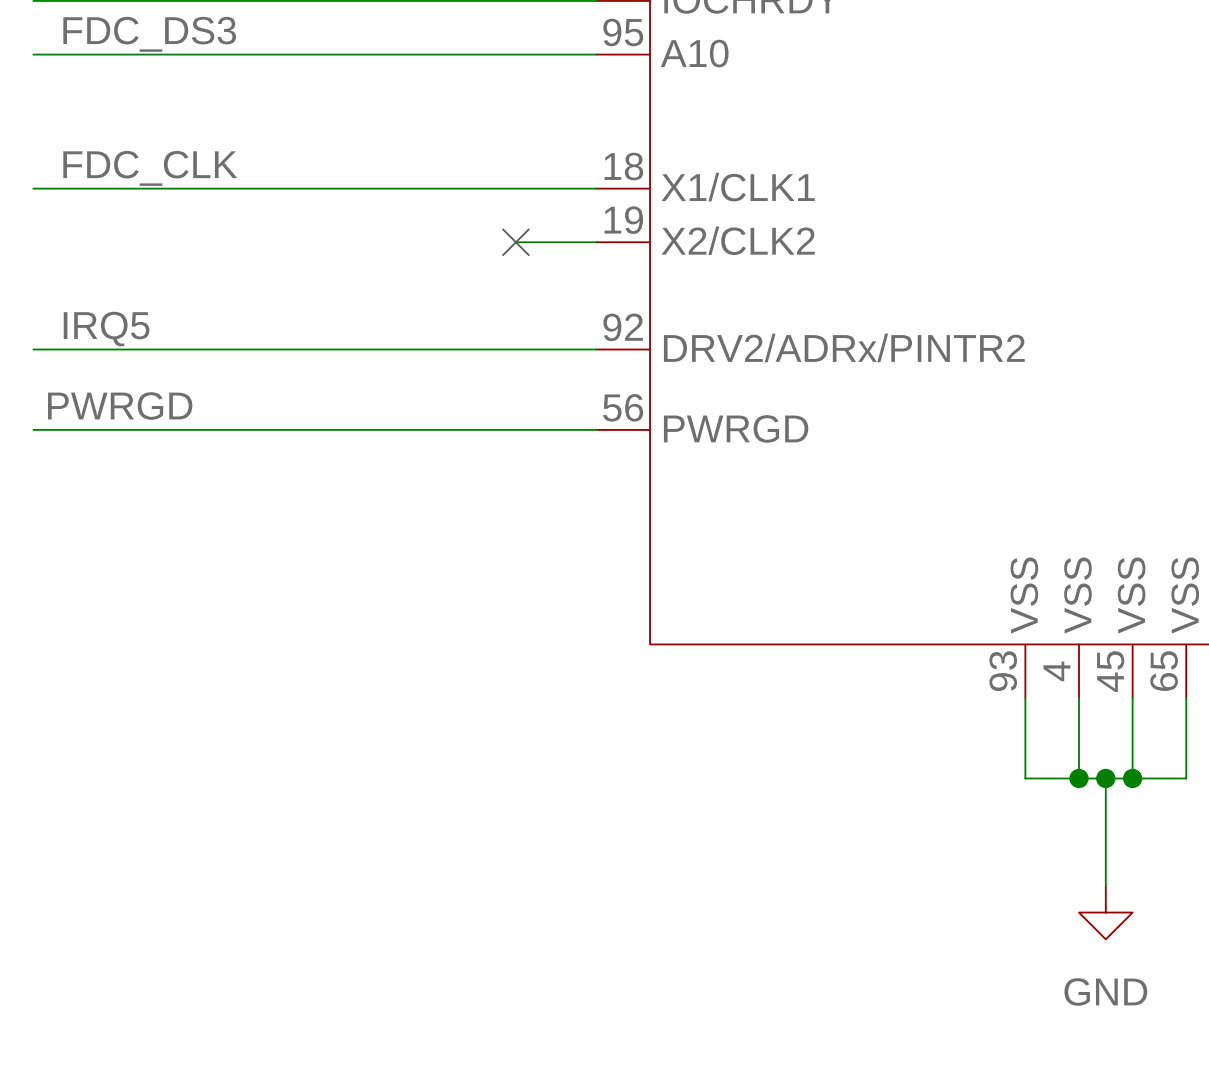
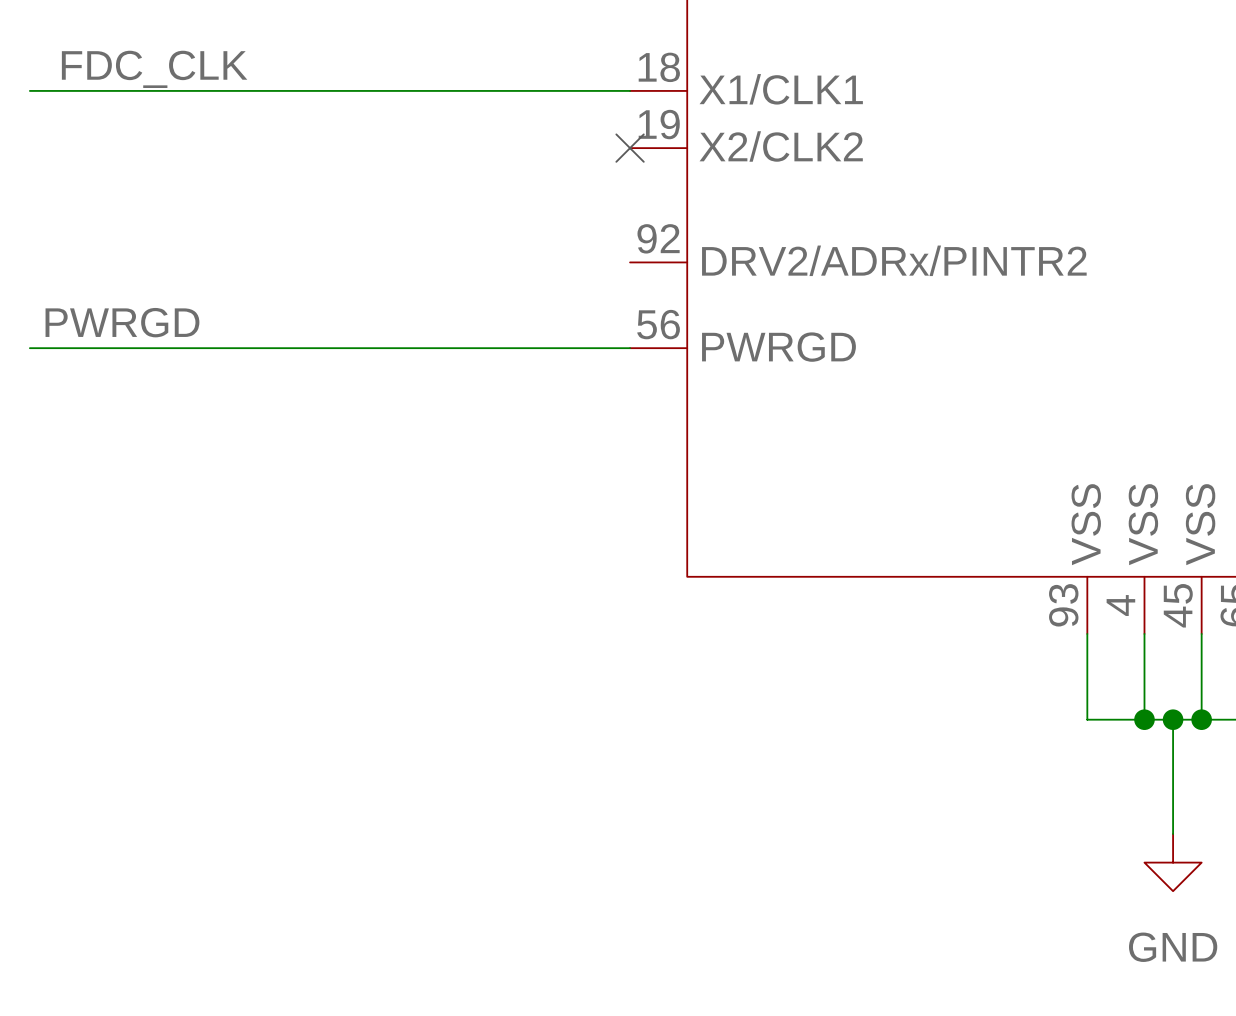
wire: (515, 242) (596, 242) -> none
no-connect mark position: (515, 242) -> (630, 148)
label: IRQ5 (106, 329) -> none
wire: (33, 349) (596, 349) -> none

